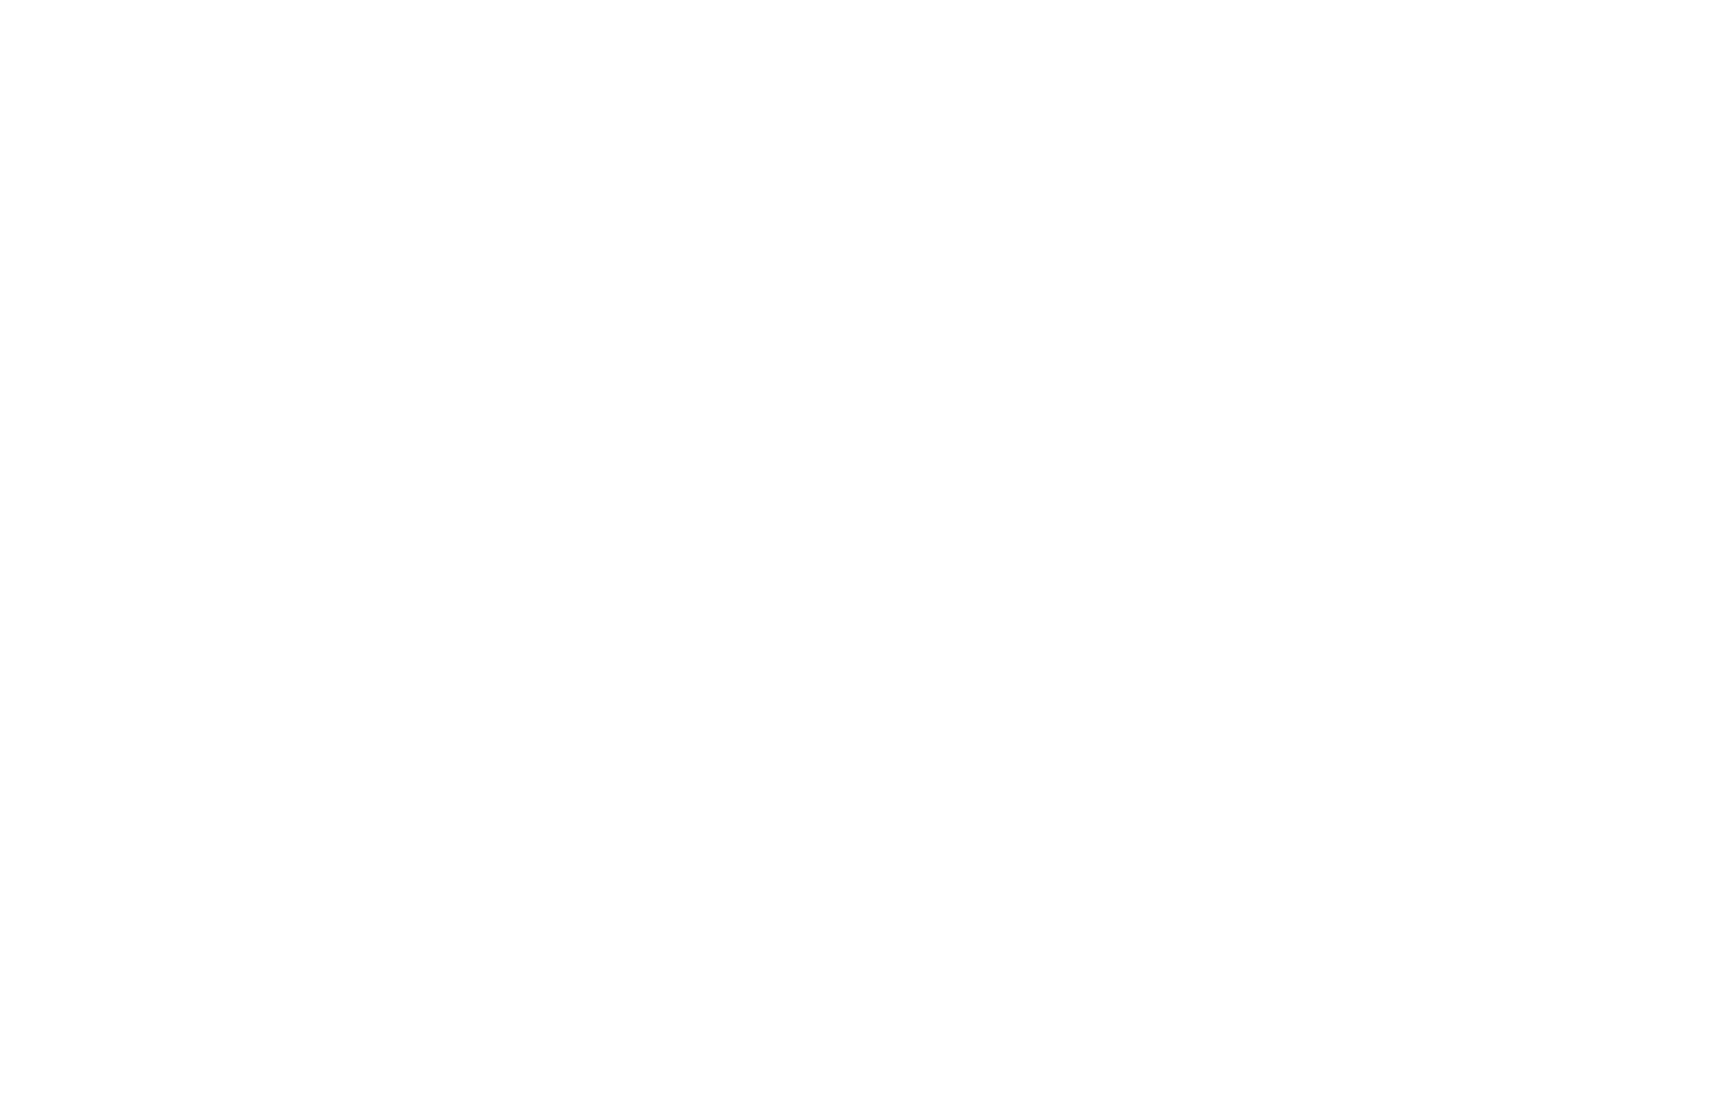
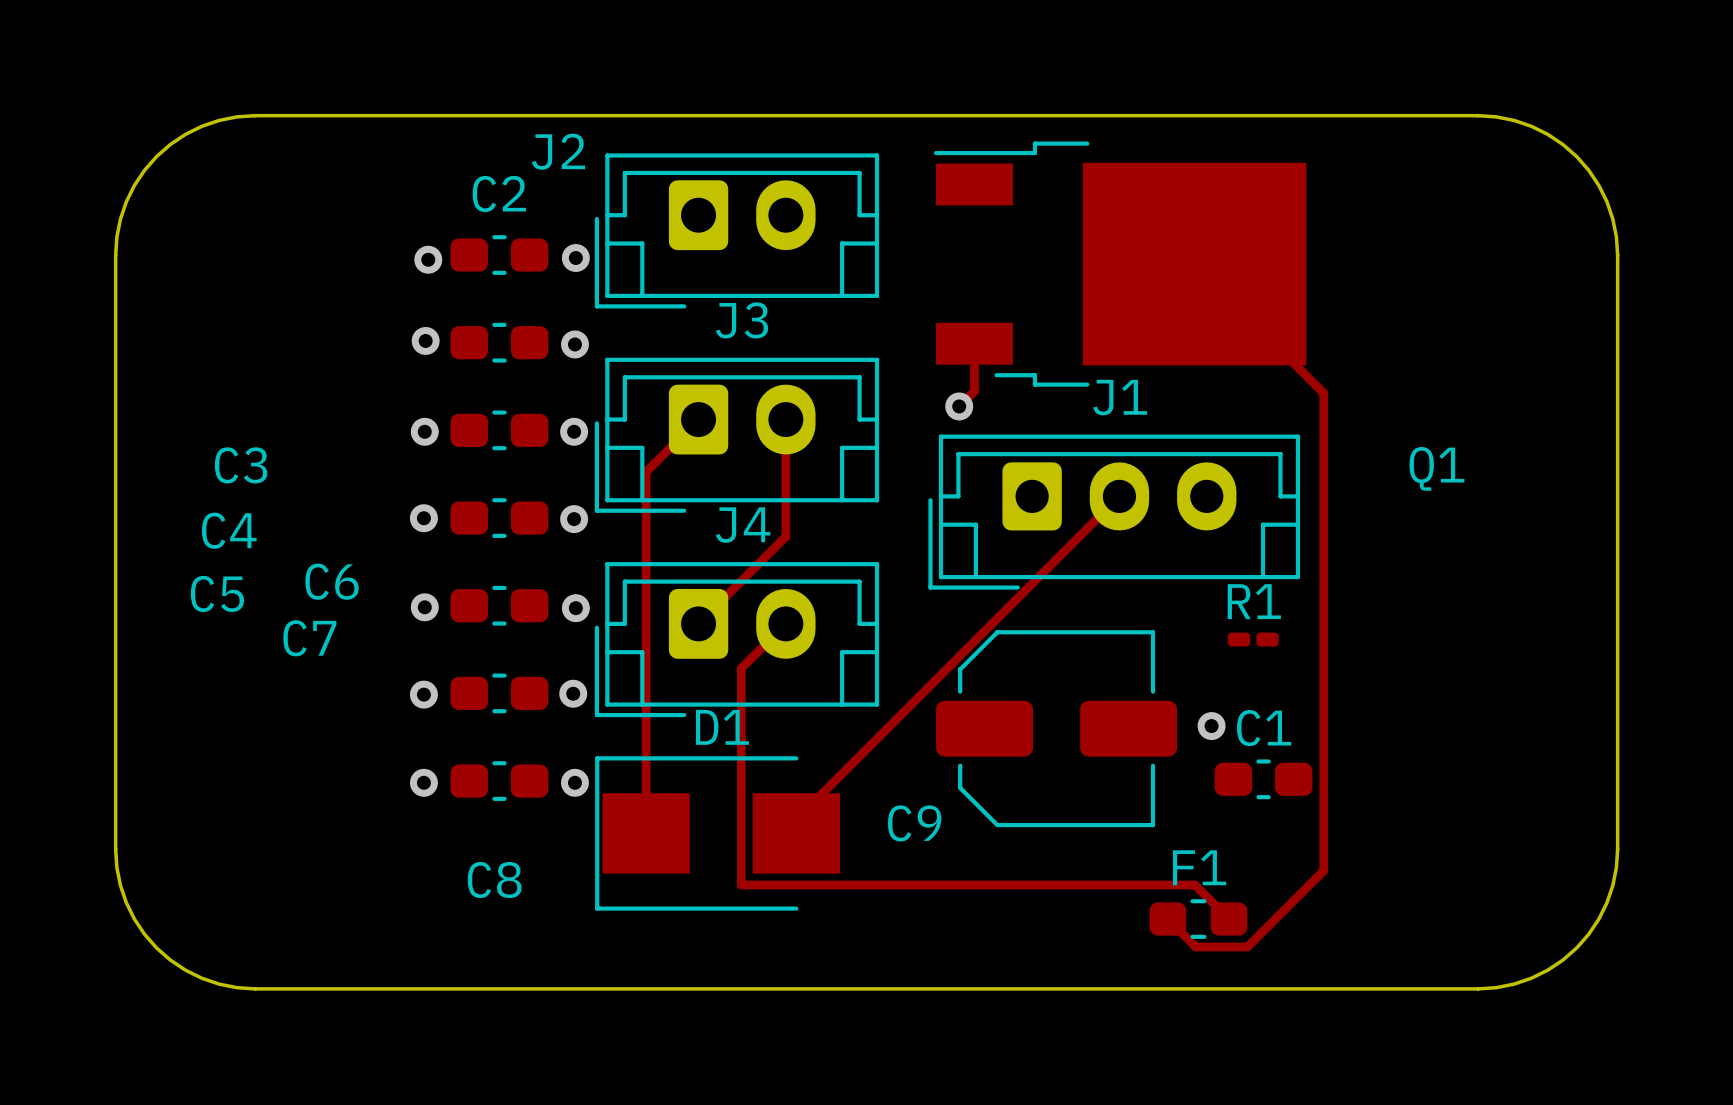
board edge: none -> (255, 115) (1477, 115) (1514, 120) (1547, 134) (1576, 156) (1598, 185) (1612, 219) (1617, 255) (1617, 849) (1612, 885) (1598, 919) (1576, 947) (1547, 970) (1514, 984) (1477, 988) (255, 988) (219, 984) (185, 970) (156, 947) (134, 919) (126, 902) (116, 867) (116, 237) (126, 201) (134, 185) (156, 156) (170, 144) (185, 134) (219, 120) (255, 115)
J2: none -> (736, 230)
C2: none -> (499, 255)
via: none -> (575, 258)
via: none -> (428, 259)
Q1: none -> (1120, 264)
top track: none -> (1194, 264) (1323, 393) (1323, 870) (1247, 946) (1195, 946) (1167, 919)
via: none -> (425, 340)
C3: none -> (499, 342)
top track: none -> (974, 343) (974, 391) (959, 406)
via: none -> (574, 344)
via: none -> (959, 406)
top track: none -> (698, 419) (646, 471) (646, 833)
top track: none -> (785, 419) (785, 536) (698, 623)
C4: none -> (499, 430)
via: none -> (424, 431)
via: none -> (574, 431)
J3: none -> (736, 435)
top track: none -> (1119, 496) (796, 819) (796, 833)
J1: none -> (1114, 512)
via: none -> (423, 518)
C5: none -> (499, 518)
via: none -> (574, 519)
C6: none -> (499, 605)
via: none -> (424, 607)
via: none -> (575, 608)
top track: none -> (785, 623) (741, 668) (741, 884) (1194, 884) (1229, 919)
J4: none -> (736, 639)
R1: none -> (1253, 639)
C7: none -> (499, 693)
via: none -> (573, 693)
via: none -> (423, 694)
via: none -> (1211, 726)
C9: none -> (1056, 728)
C1: none -> (1263, 779)
C8: none -> (499, 781)
via: none -> (423, 782)
via: none -> (574, 782)
D1: none -> (717, 833)
F1: none -> (1198, 919)

